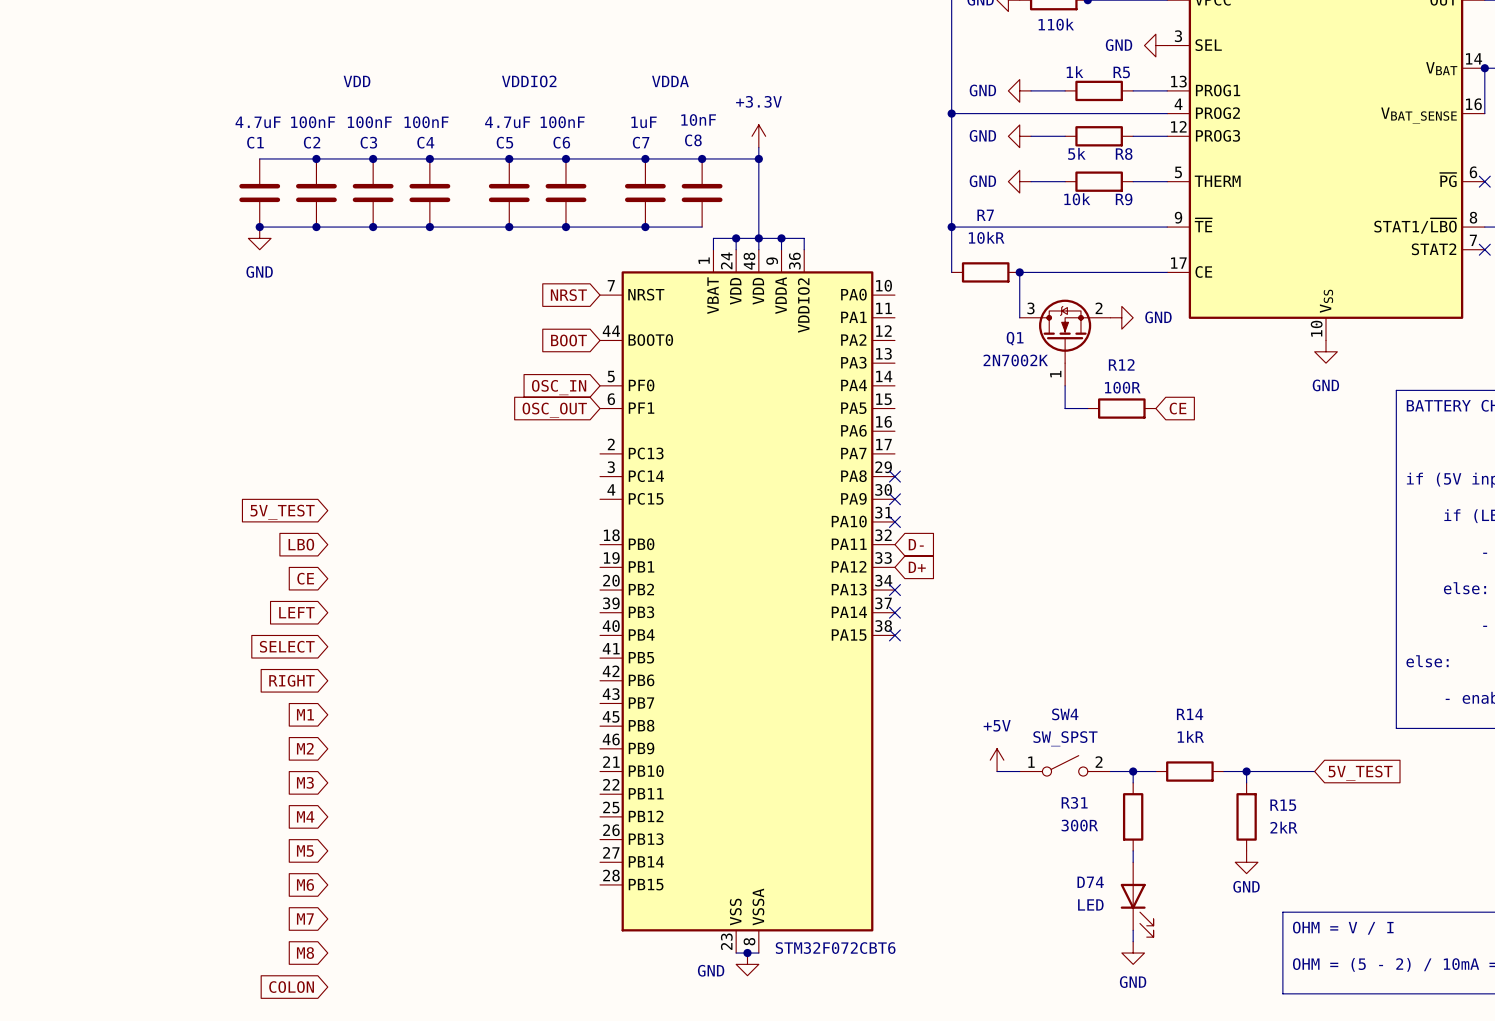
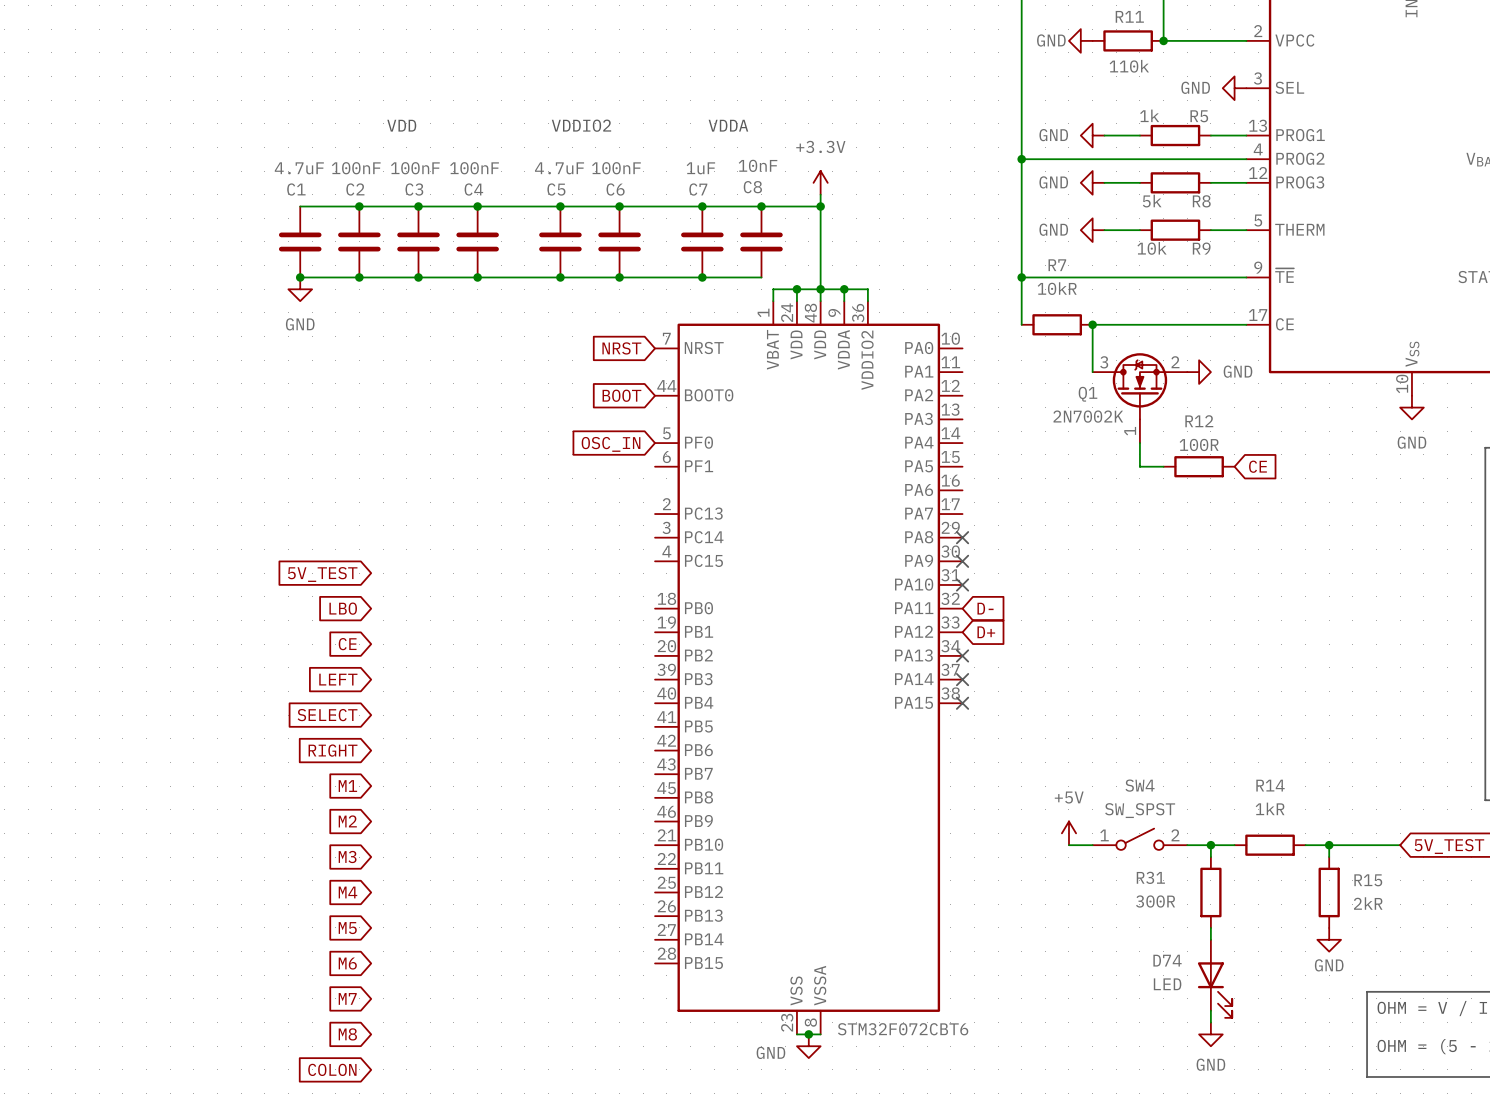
global label: OSC_OUT (554, 410) -> none

